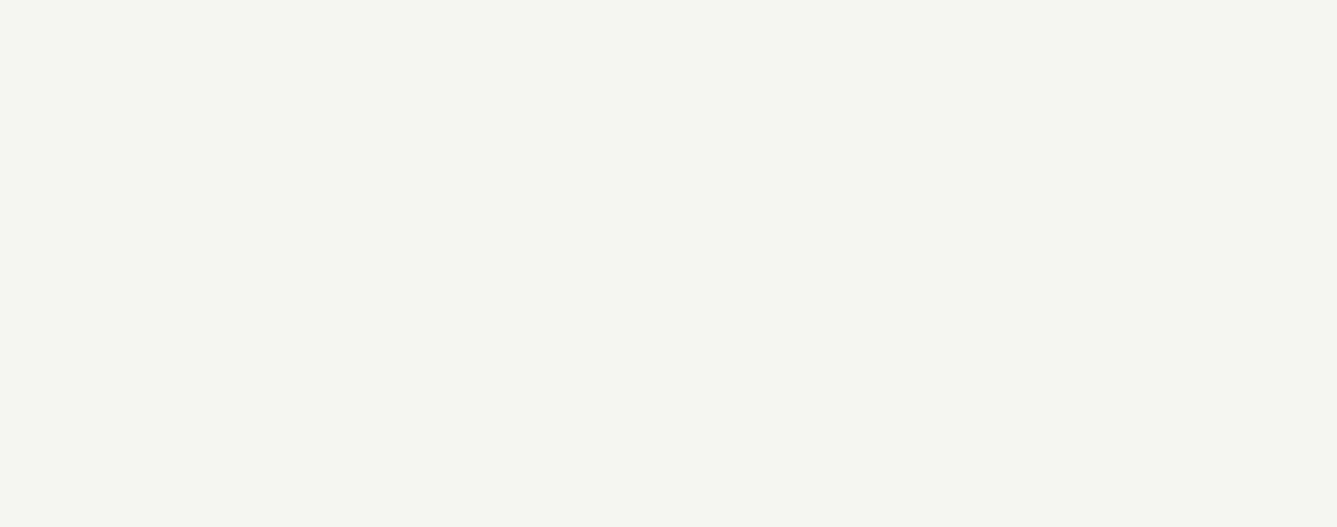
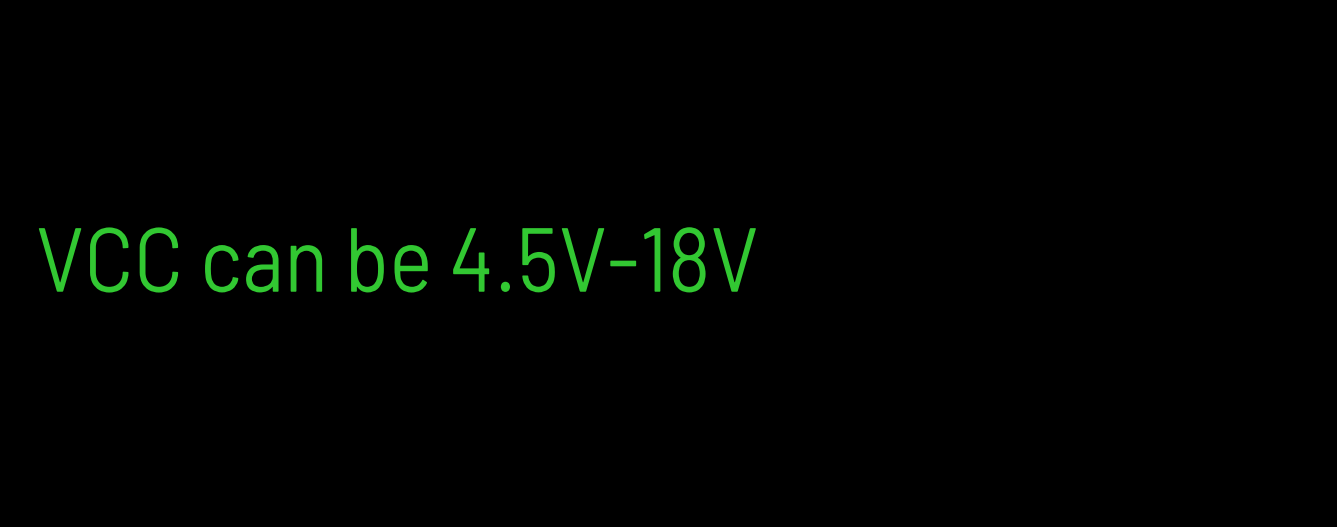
text: none -> VCC can be 4.5V-18V (397, 259)

